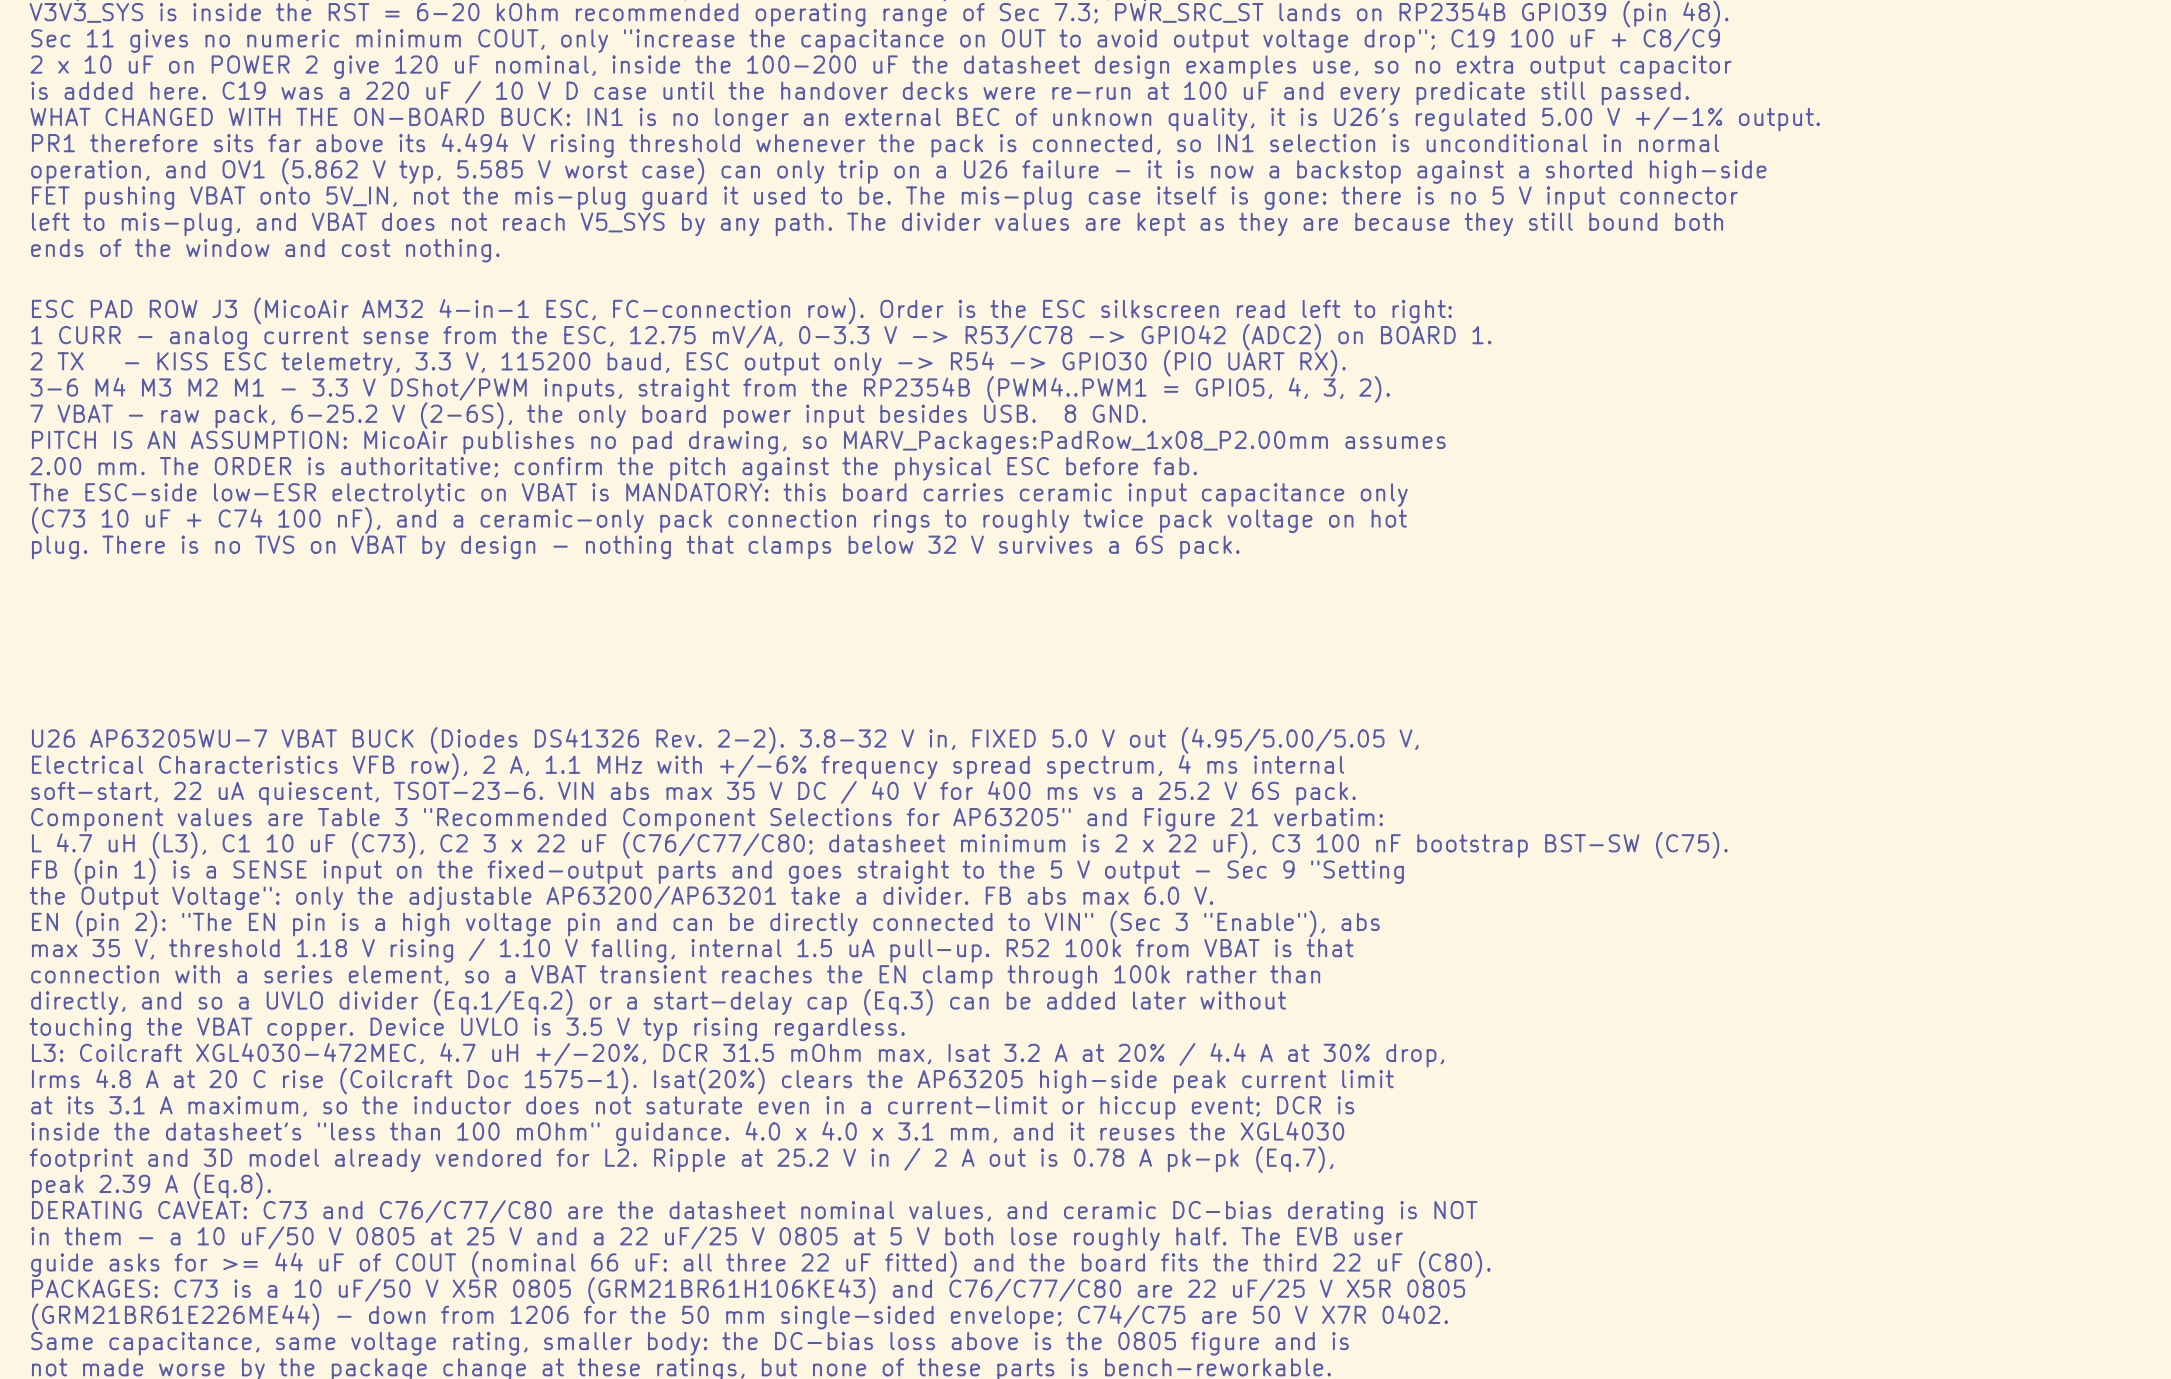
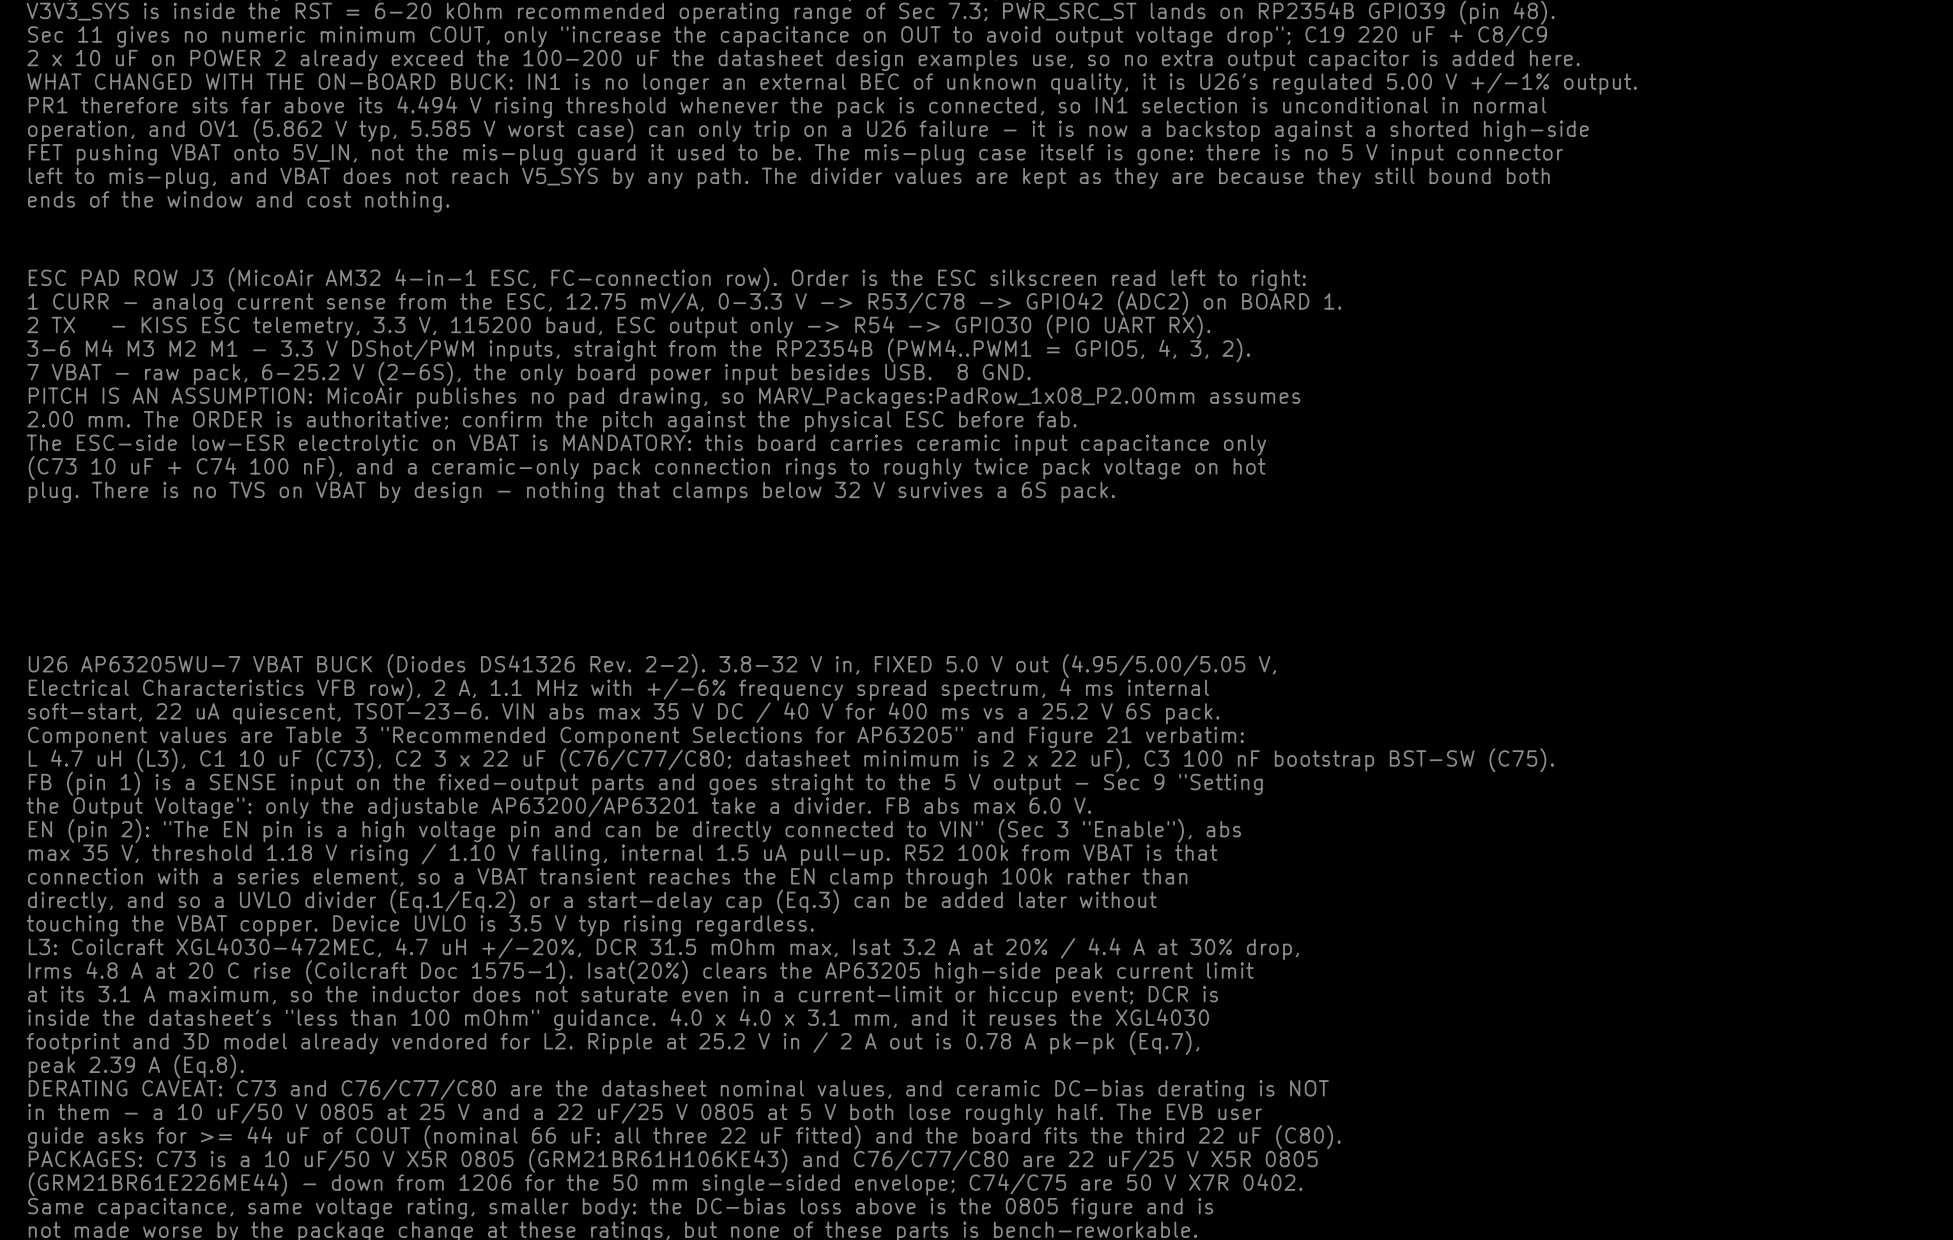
text: Sec 11 gives no numeric minimum COUT, only "increase the capacitance on OUT to avoid output voltage drop"; C19 100 uF + C8/C9 (875, 40) -> Sec 11 gives no numeric minimum COUT, only "increase the capacitance on OUT to avoid output voltage drop"; C19 220 uF + C8/C9 (787, 36)
text: 2 x 10 uF on POWER 2 give 120 uF nominal, inside the 100-200 uF the datasheet design examples use, so no extra output capacitor (881, 67) -> 2 x 10 uF on POWER 2 already exceed the 100-200 uF the datasheet design examples use, so no extra output capacitor is added here. (803, 60)
text: is added here. C19 was a 220 uF / 10 V D case until the handover decks were re-run at 100 uF and every predicate still passed. (860, 93) -> WHAT CHANGED WITH THE ON-BOARD BUCK: IN1 is no longer an external BEC of unknown quality, it is U26's regulated 5.00 V +/-1% output. (832, 83)
text: WHAT CHANGED WITH THE ON-BOARD BUCK: IN1 is no longer an external BEC of unknown quality, it is U26's regulated 5.00 V +/-1% output. (925, 119) -> PR1 therefore sits far above its 4.494 V rising threshold whenever the pack is connected, so IN1 selection is unconditional in normal (787, 107)
text: PR1 therefore sits far above its 4.494 V rising threshold whenever the pack is connected, so IN1 selection is unconditional in normal (875, 145) -> operation, and OV1 (5.862 V typ, 5.585 V worst case) can only trip on a U26 failure - it is now a backstop against a shorted high-side (808, 130)
text: operation, and OV1 (5.862 V typ, 5.585 V worst case) can only trip on a U26 failure - it is now a backstop against a shorted high-side (898, 171) -> FET pushing VBAT onto 5V_IN, not the mis-plug guard it used to be. The mis-plug case itself is gone: there is no 5 V input connector (795, 154)
text: FET pushing VBAT onto 5V_IN, not the mis-plug guard it used to be. The mis-plug case itself is gone: there is no 5 V input connector (884, 198) -> left to mis-plug, and VBAT does not reach V5_SYS by any path. The divider values are kept as they are because they still bound both (789, 178)
text: left to mis-plug, and VBAT does not reach V5_SYS by any path. The divider values are kept as they are because they still bound both (877, 224) -> ends of the window and cost nothing. (238, 201)
text: ends of the window and cost nothing. (265, 250) -> none

